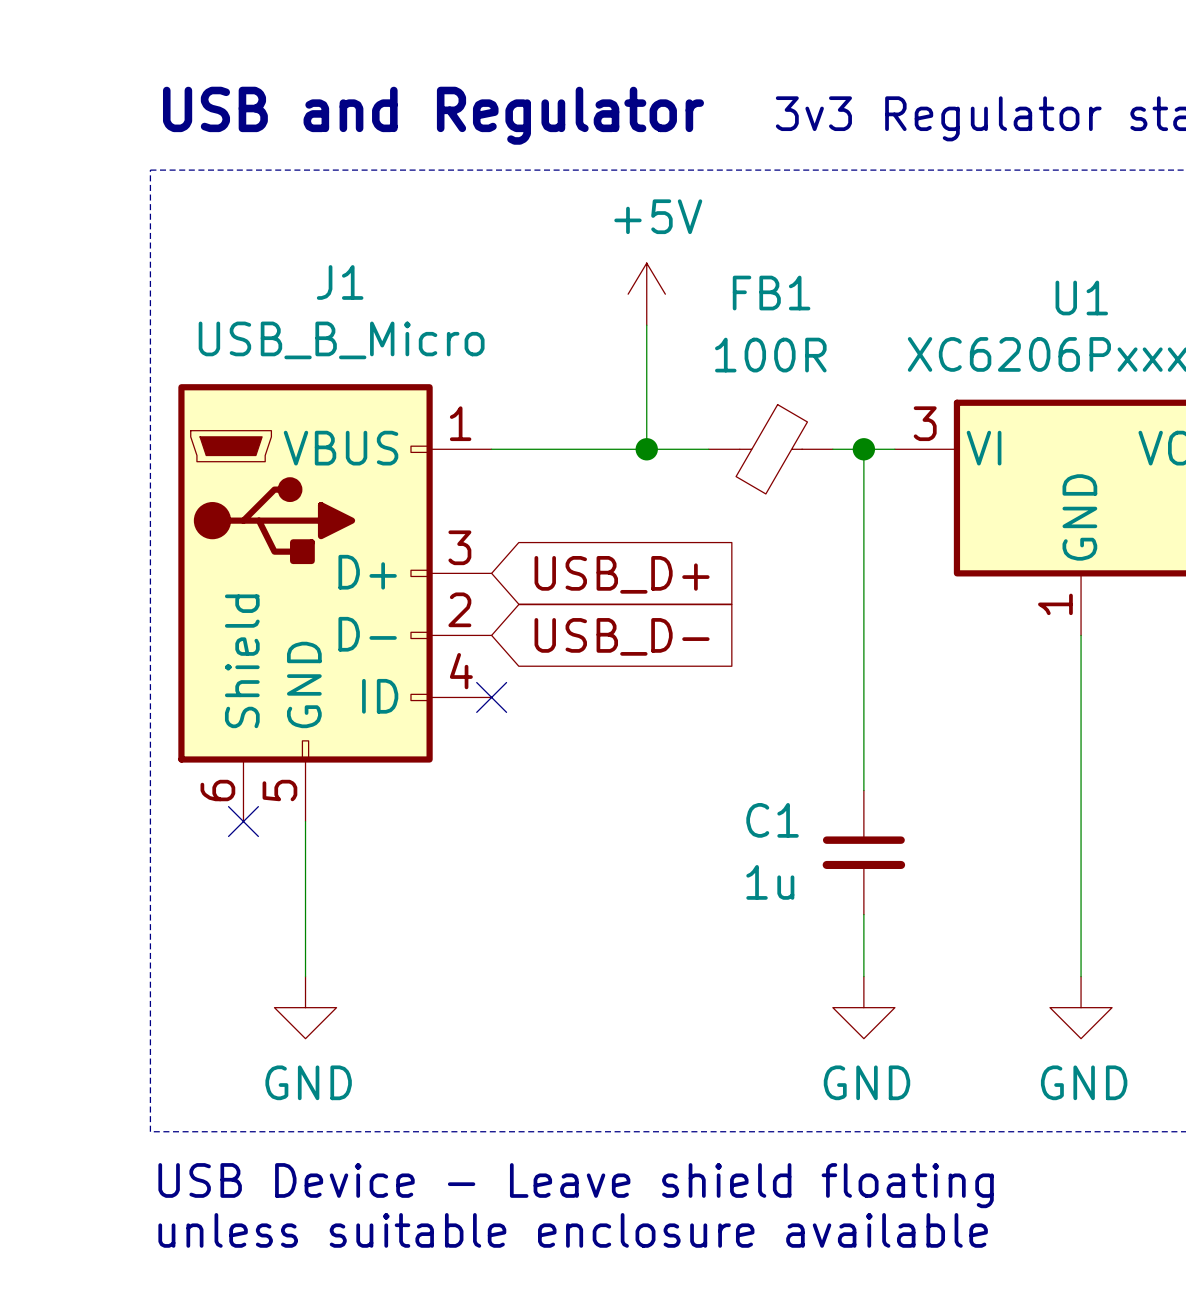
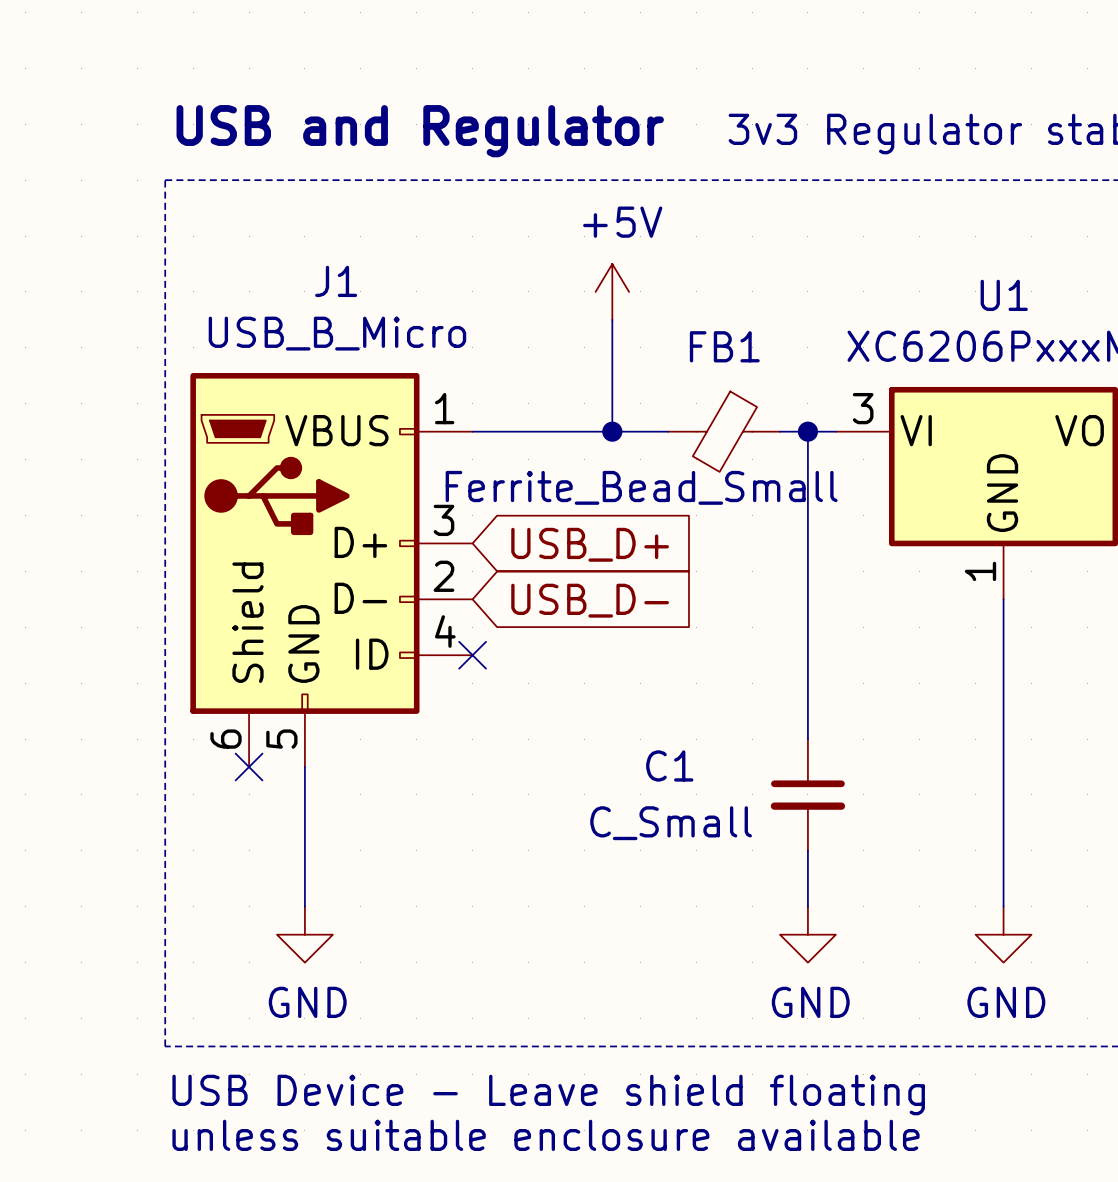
FB1 name position: FB1 (771, 293) -> FB1 (724, 346)
FB1 value: 100R (770, 355) -> Ferrite_Bead_Small (641, 487)
C1 name position: C1 (772, 820) -> C1 (669, 765)
C1 value: 1u (770, 882) -> C_Small (671, 823)

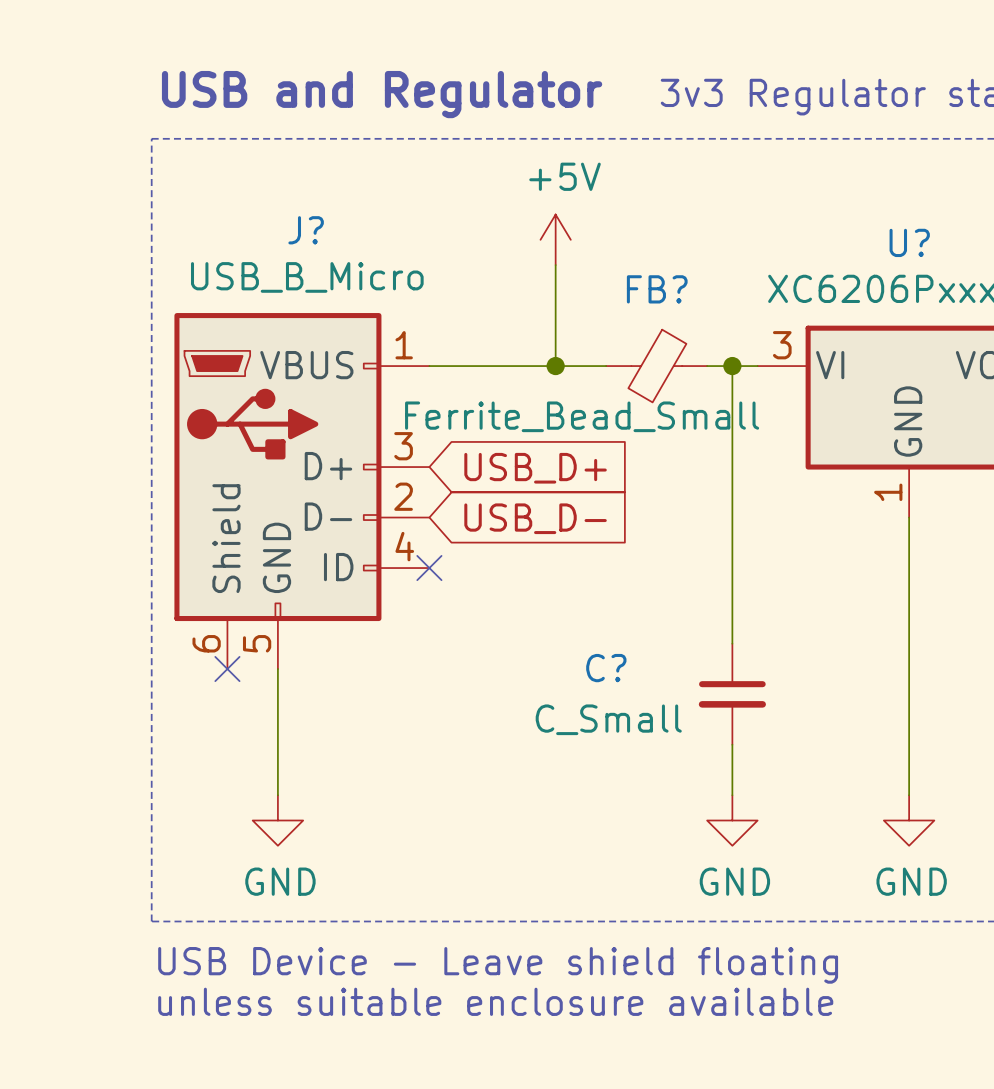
J1 name: J1 (336, 281) -> J? (306, 230)
U1 name: U1 (1004, 295) -> U? (909, 242)
FB1 name: FB1 (724, 346) -> FB? (657, 289)
C1 name: C1 (669, 765) -> C? (606, 668)

